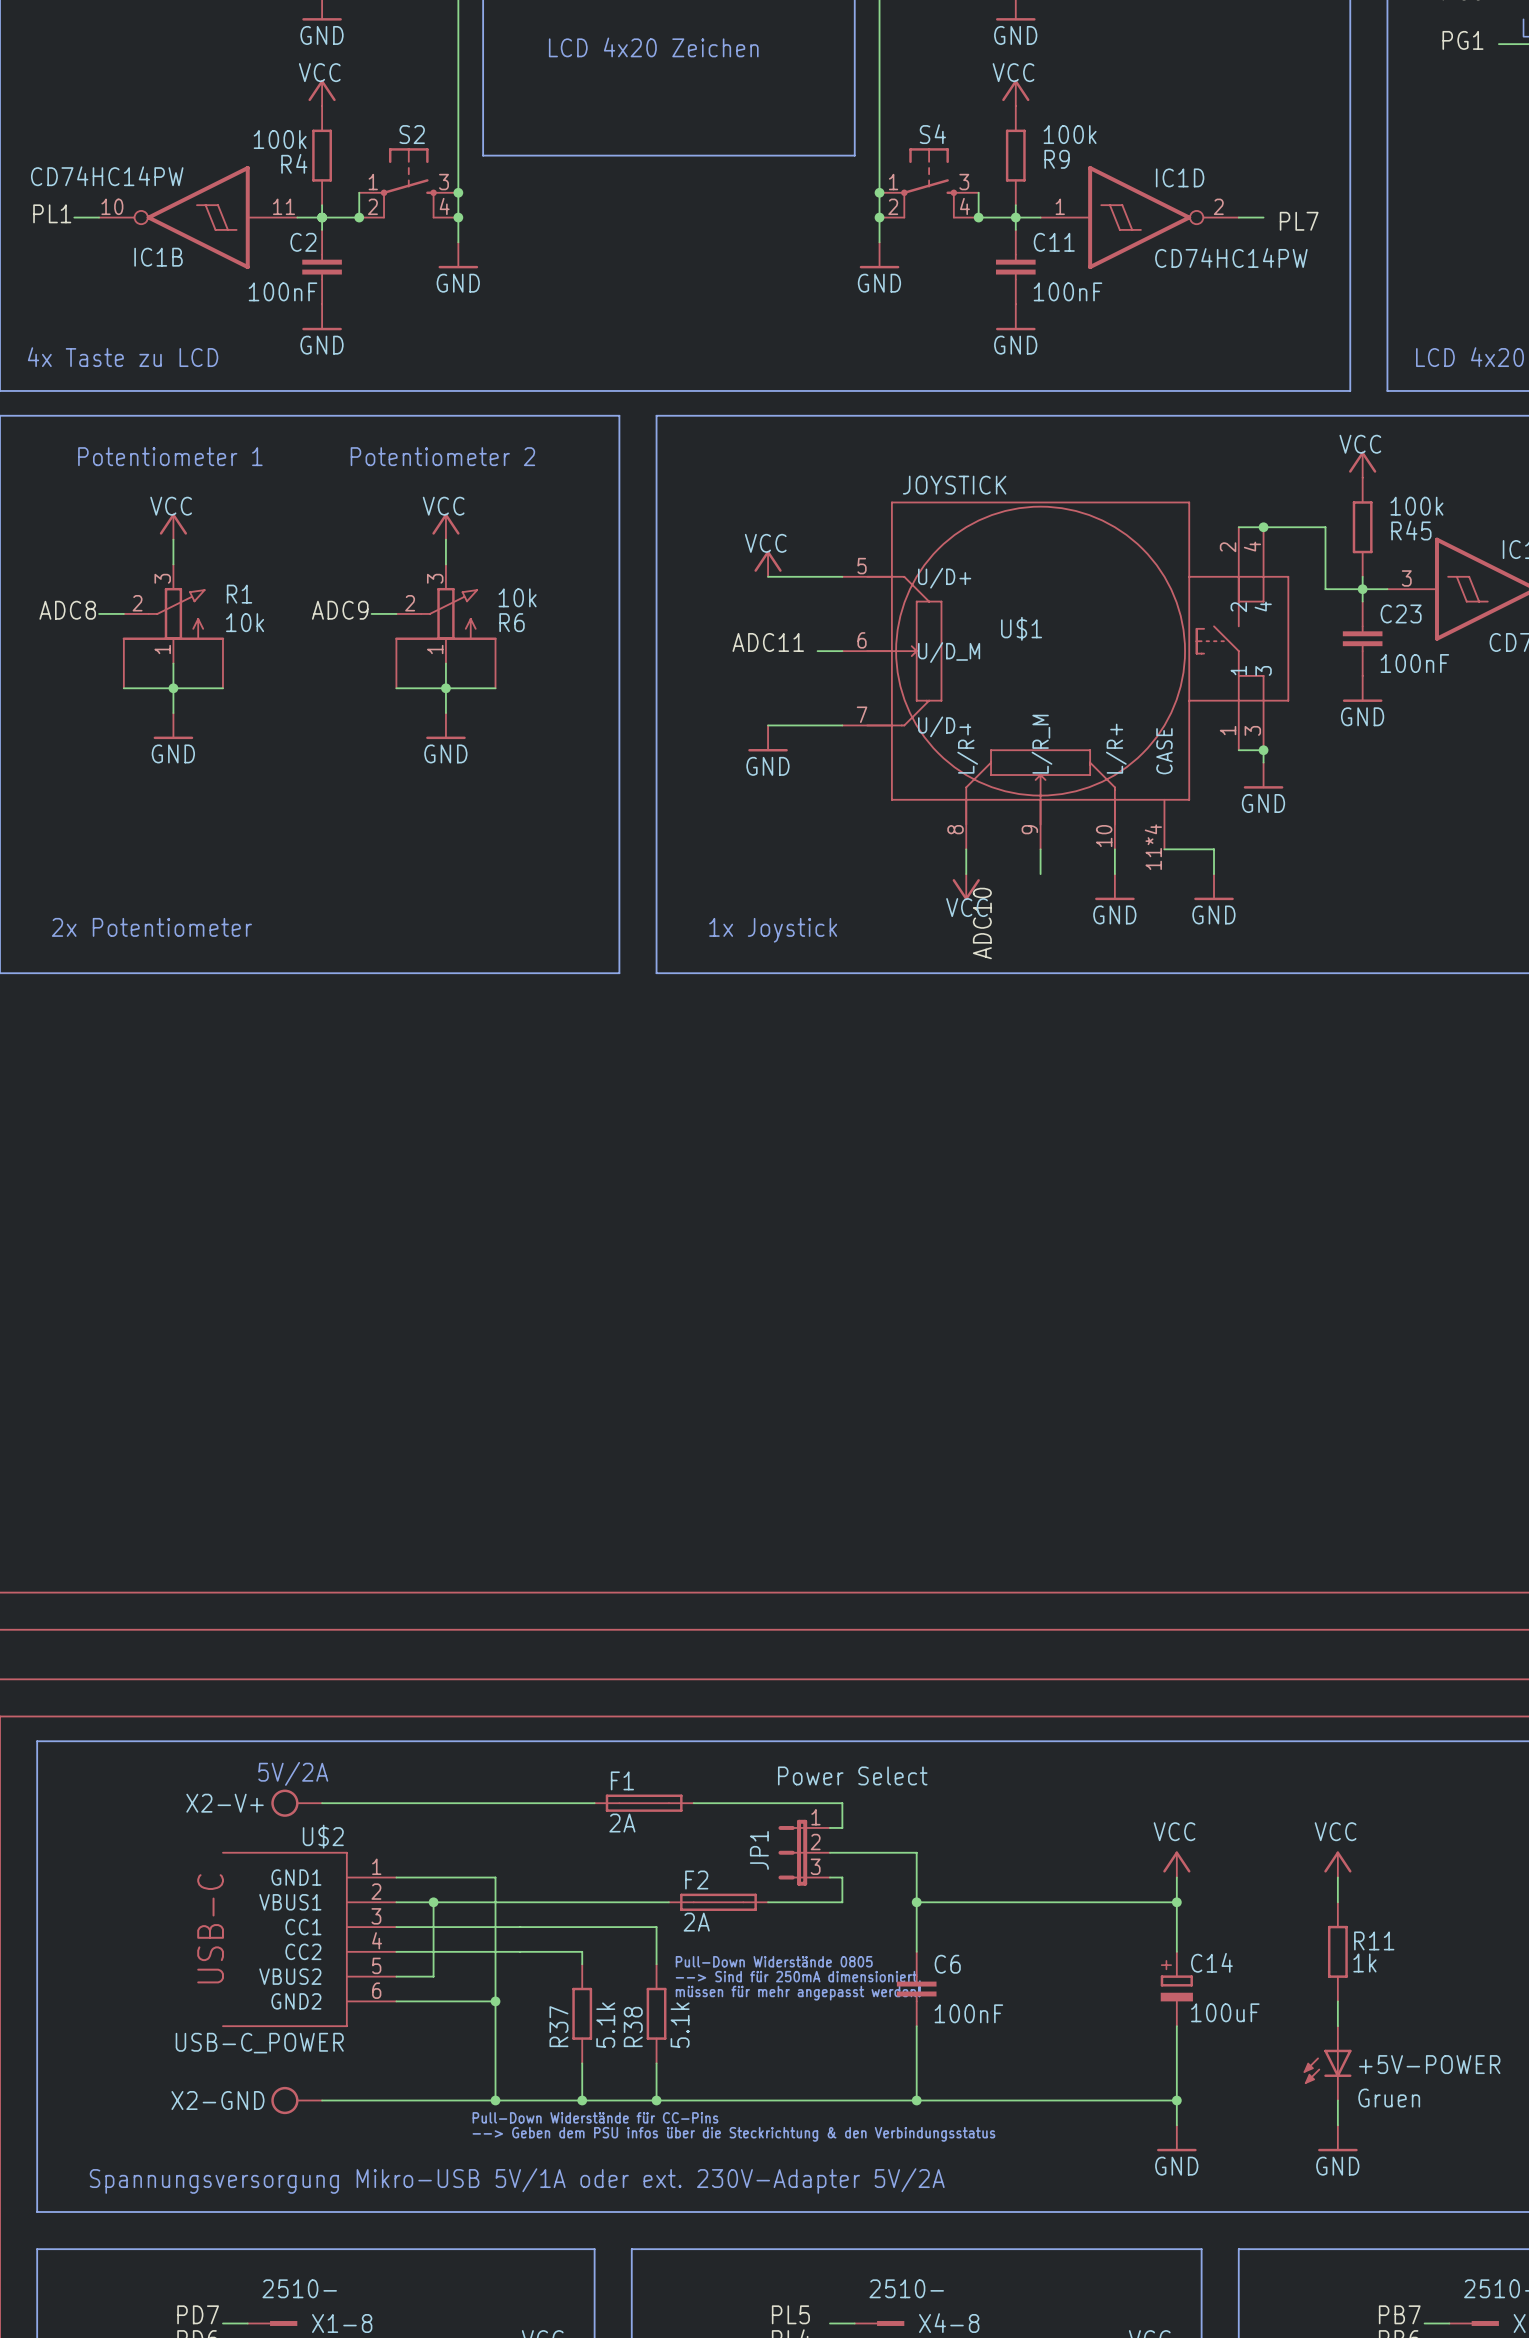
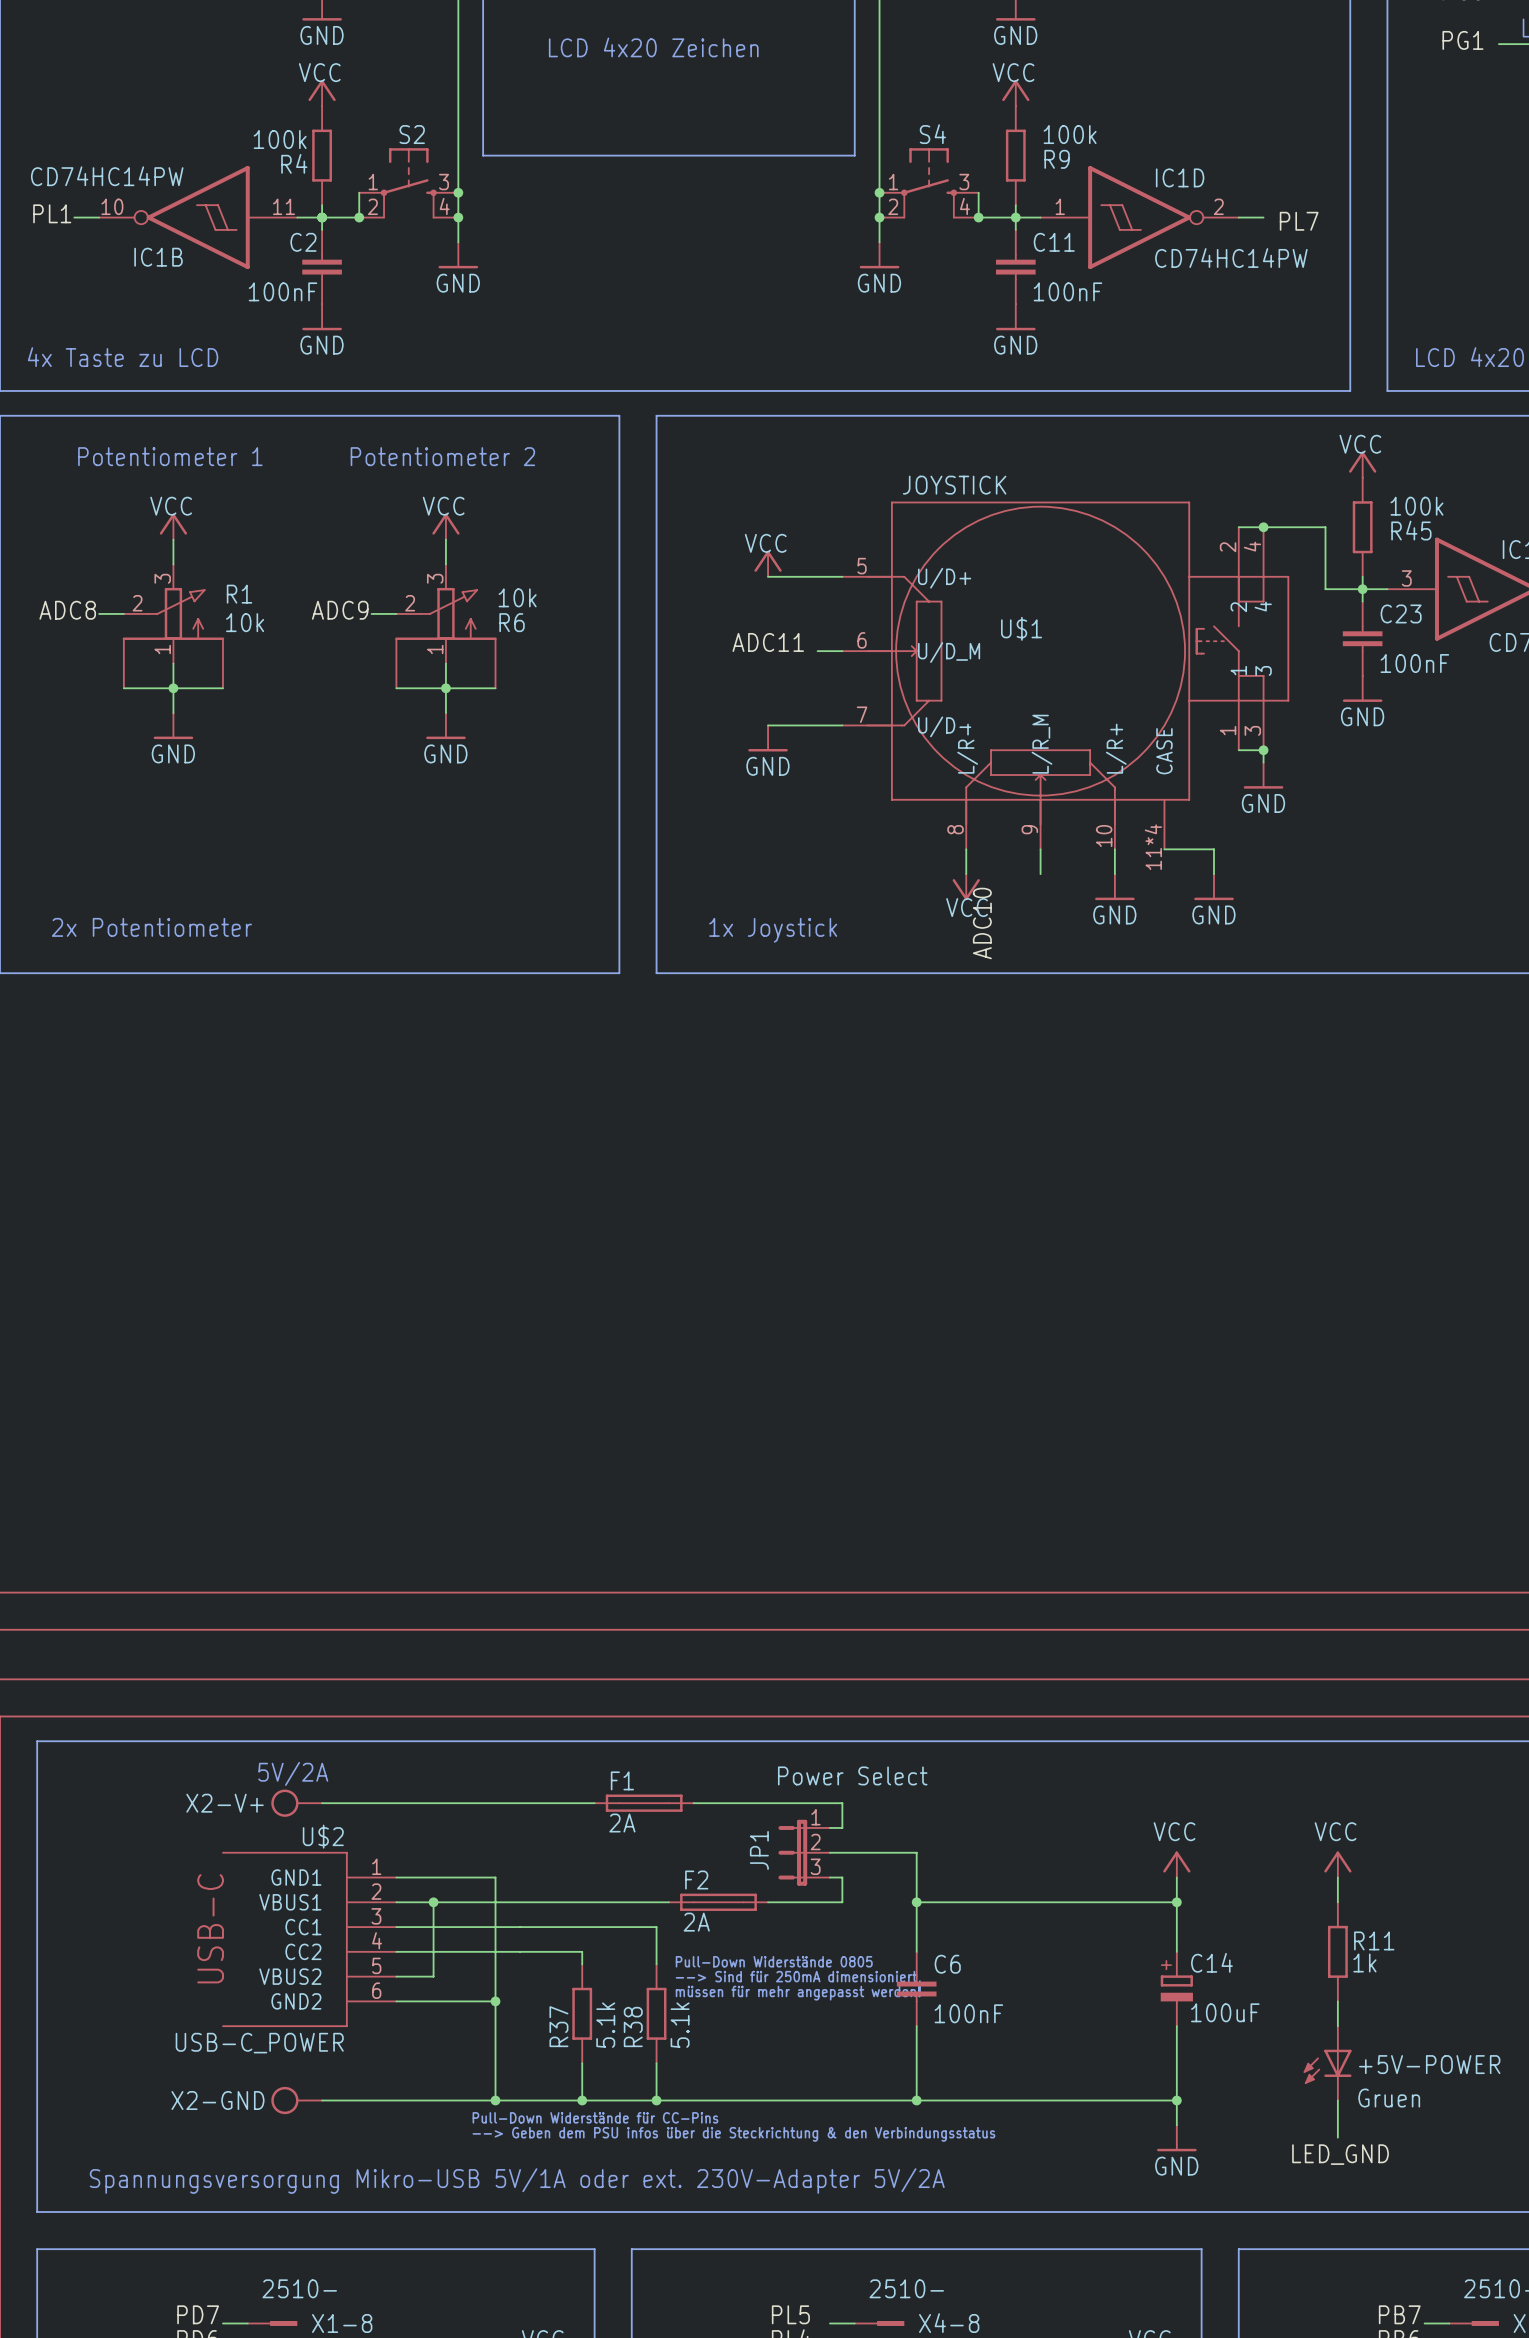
power symbol: GND (1337, 2138) -> none
label: none -> LED_GND (1340, 2154)

